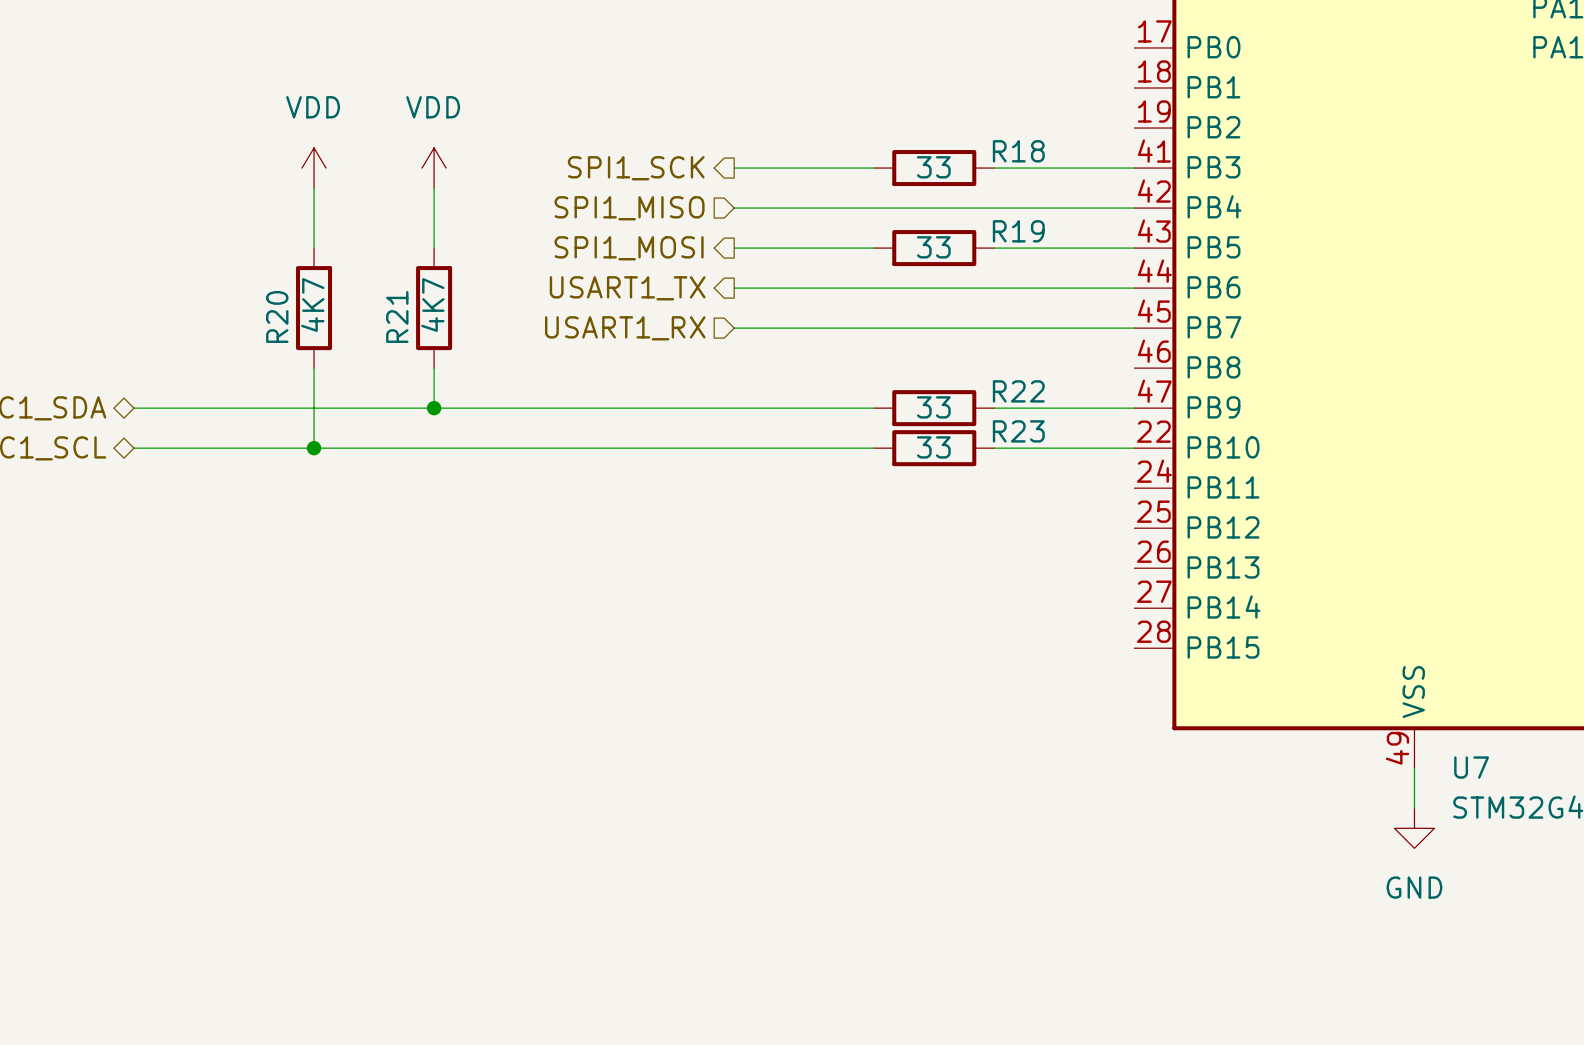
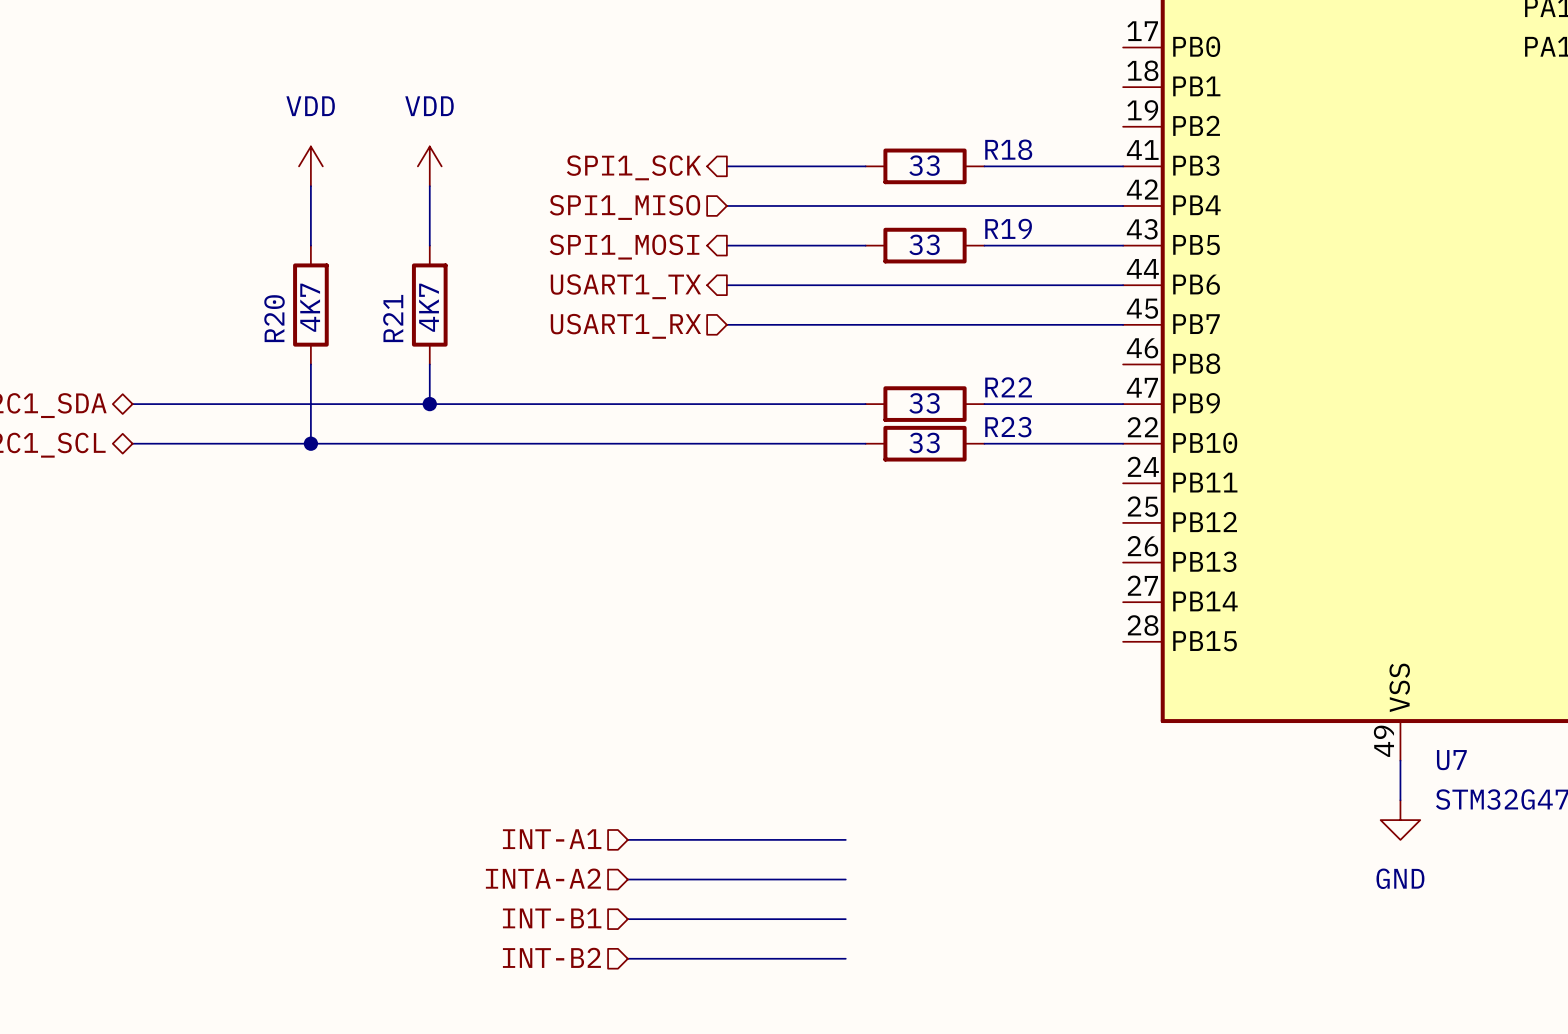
hierarchical label: none -> INT-A1 (552, 839)
wire: none -> (627, 839) (845, 839)
hierarchical label: none -> INTA-A2 (543, 878)
wire: none -> (627, 879) (845, 879)
hierarchical label: none -> INT-B1 (552, 918)
wire: none -> (627, 919) (845, 919)
hierarchical label: none -> INT-B2 (551, 957)
wire: none -> (627, 958) (845, 958)

